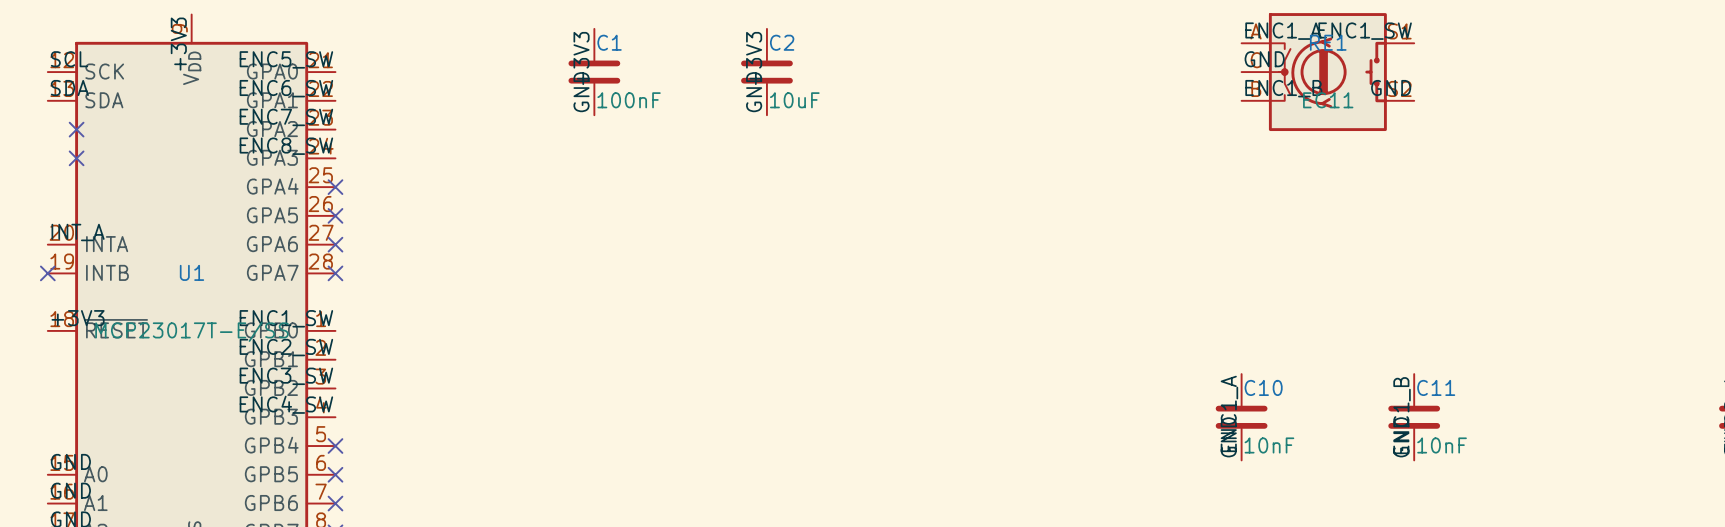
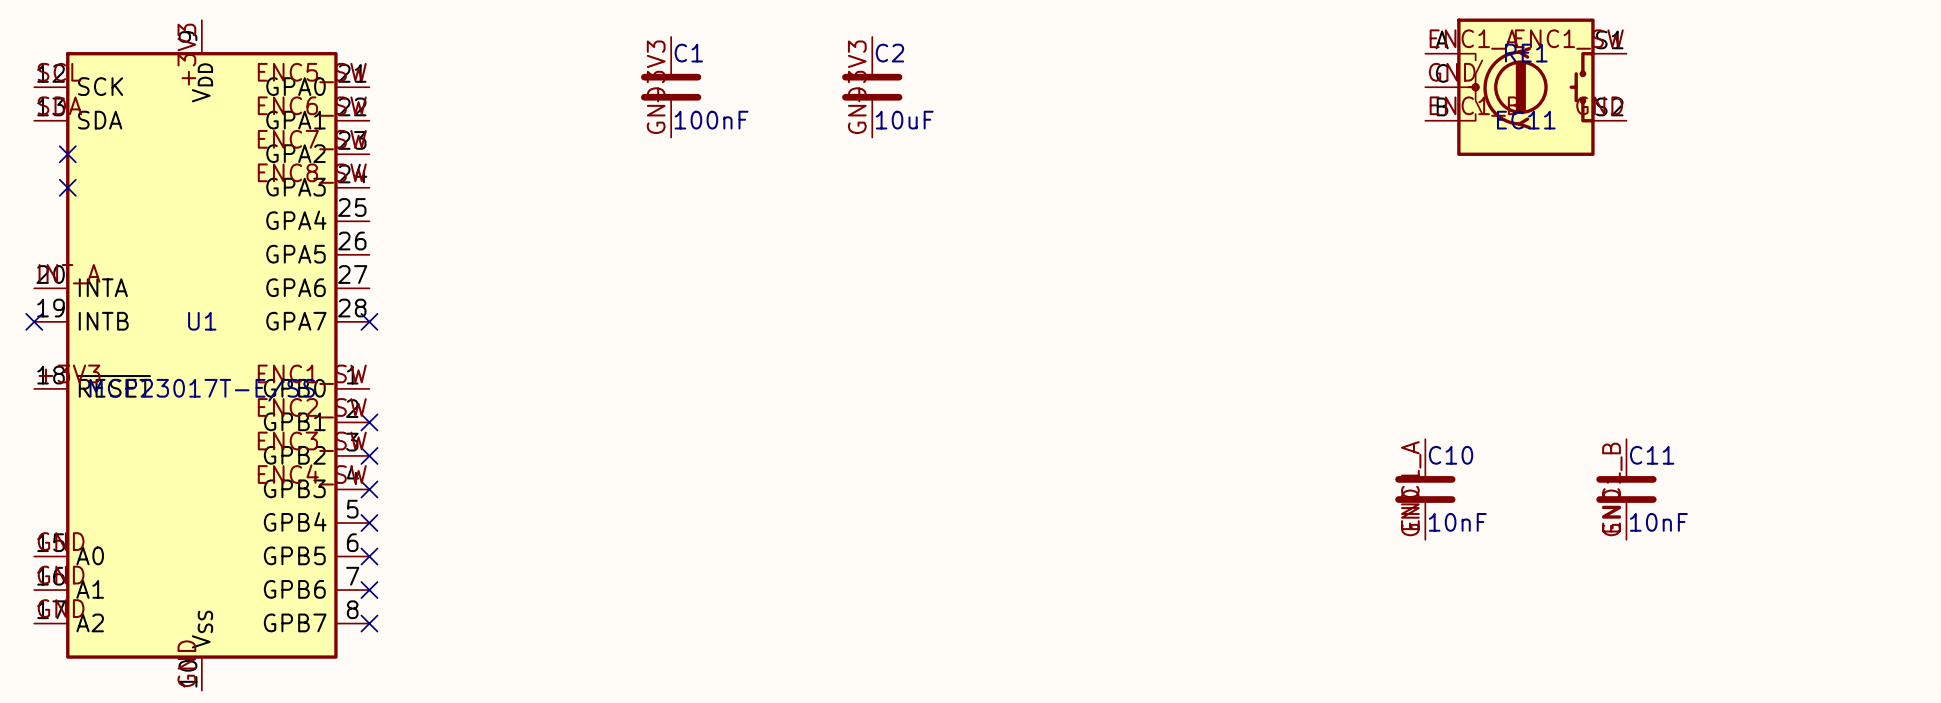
no-connect mark: (335, 187) -> none
no-connect mark: (335, 215) -> none
no-connect mark: (335, 244) -> none
no-connect mark: none -> (369, 422)
no-connect mark: none -> (369, 455)
no-connect mark: none -> (369, 489)

